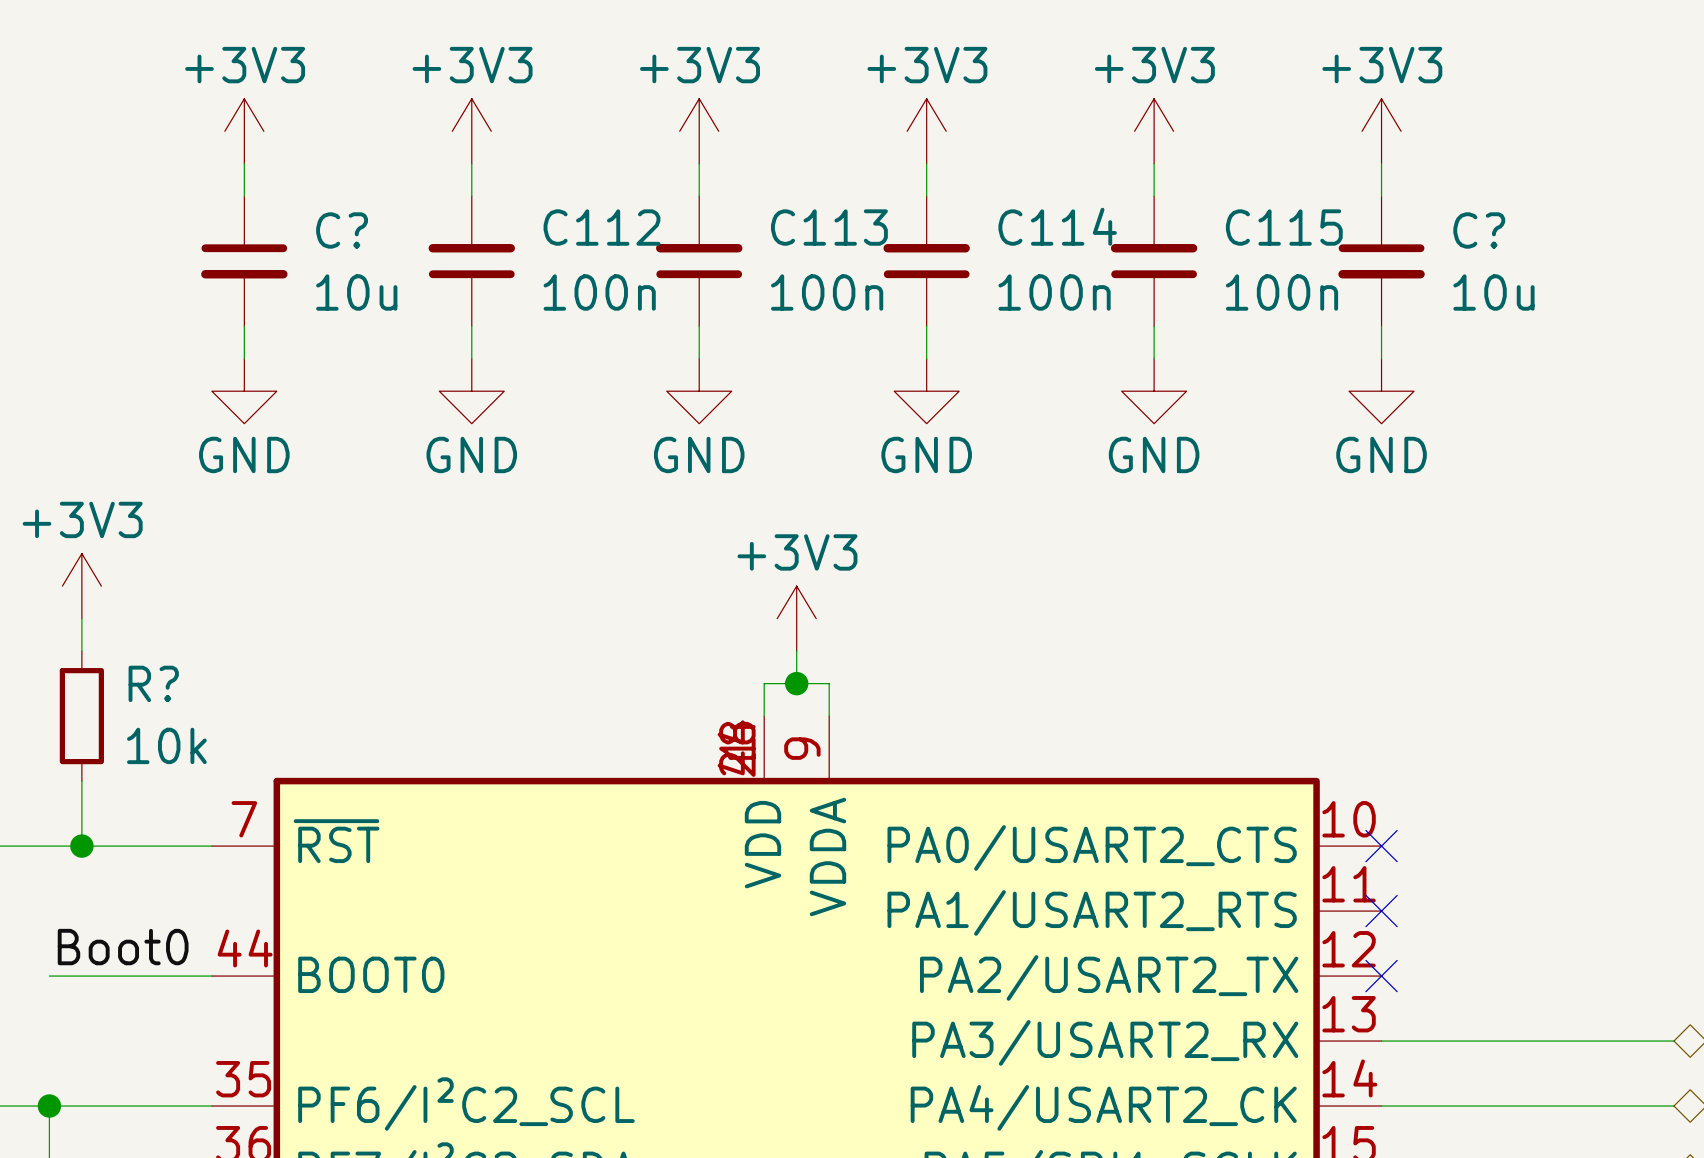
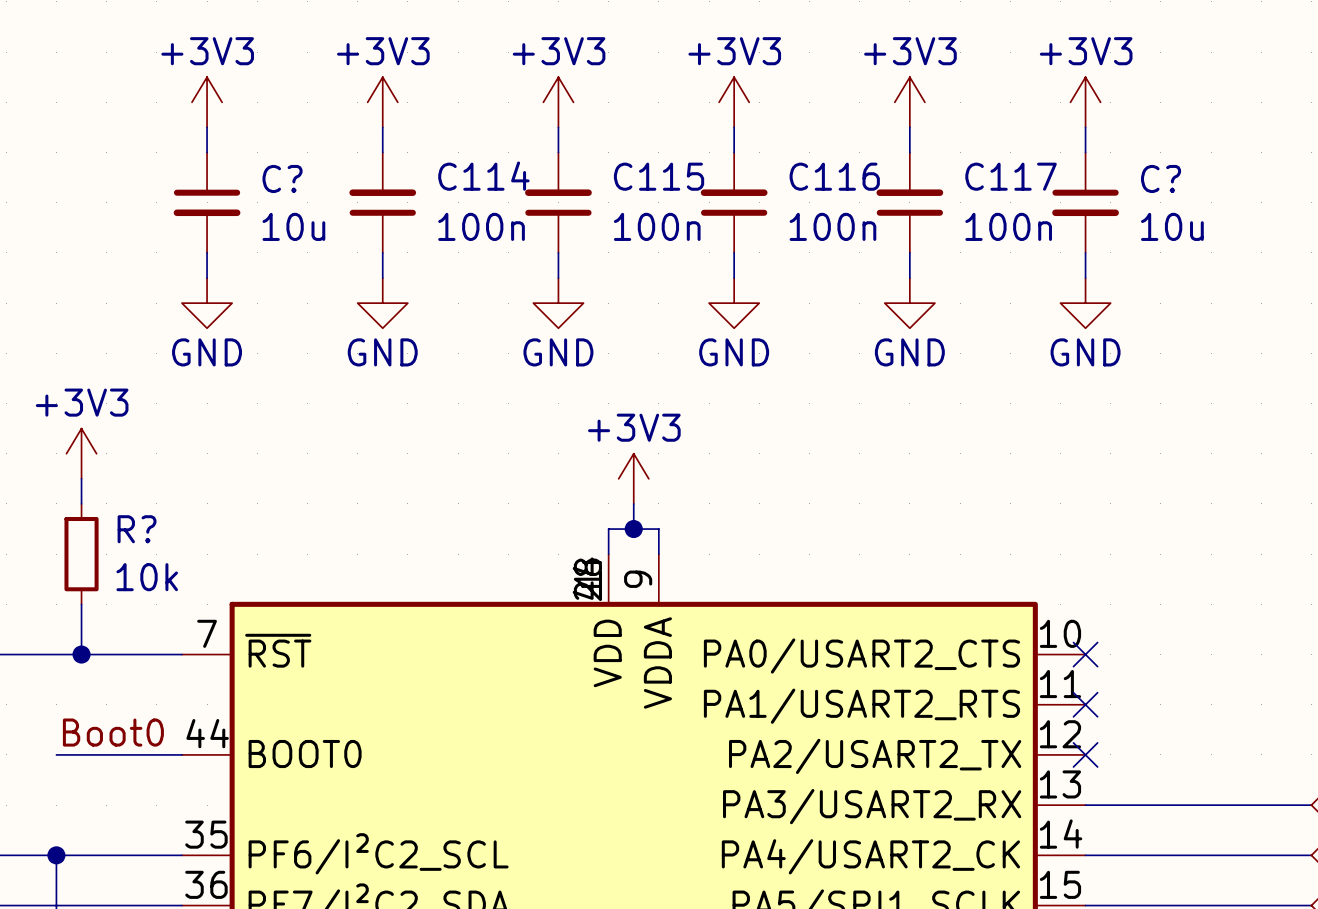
C114 name: C114 (1057, 226) -> C116 (834, 176)
C112 name: C112 (601, 227) -> C114 (483, 176)
C113 name: C113 (829, 227) -> C115 (659, 176)
C115 name: C115 (1284, 227) -> C117 (1011, 176)

